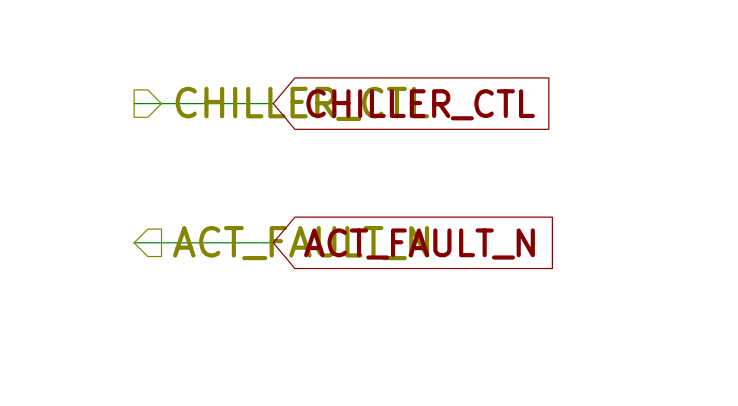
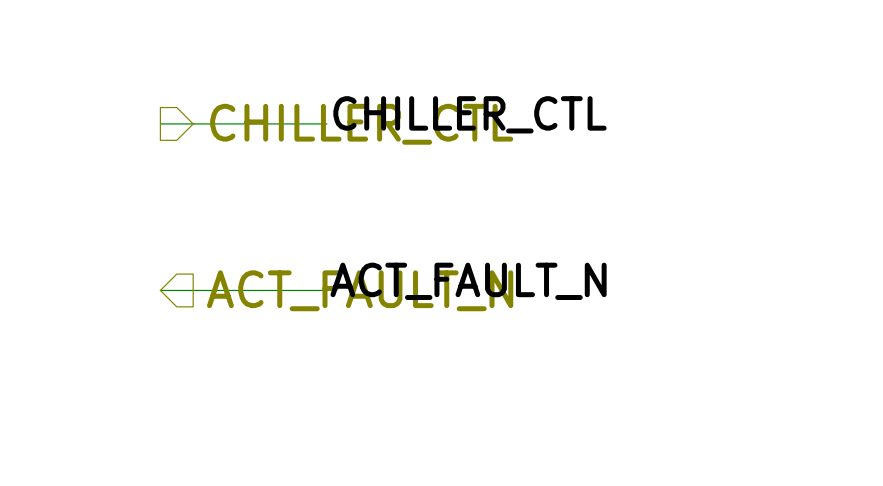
label: none -> CHILLER_CTL (469, 114)
global label: CHILLER_CTL (420, 104) -> none
label: none -> ACT_FAULT_N (468, 281)
global label: ACT_FAULT_N (419, 244) -> none

